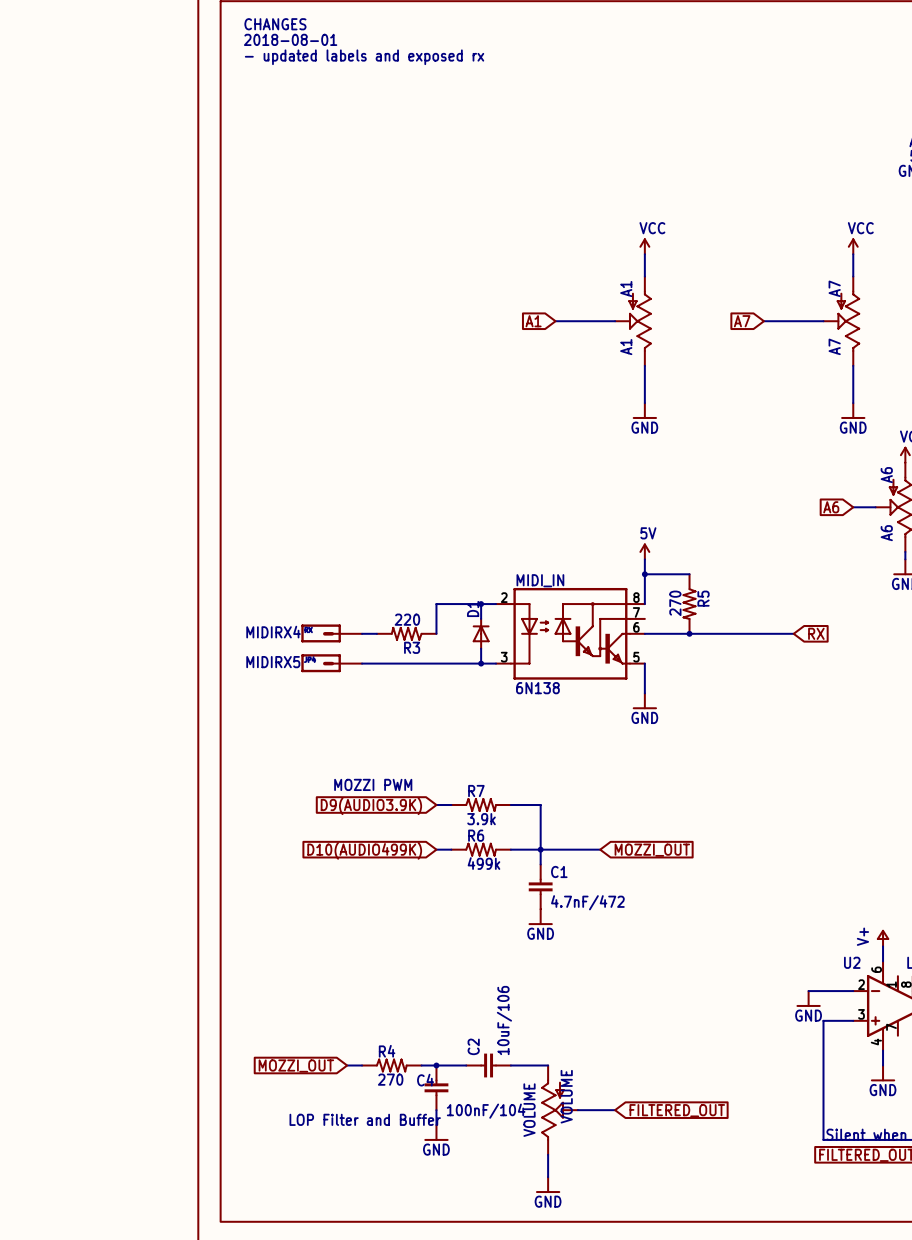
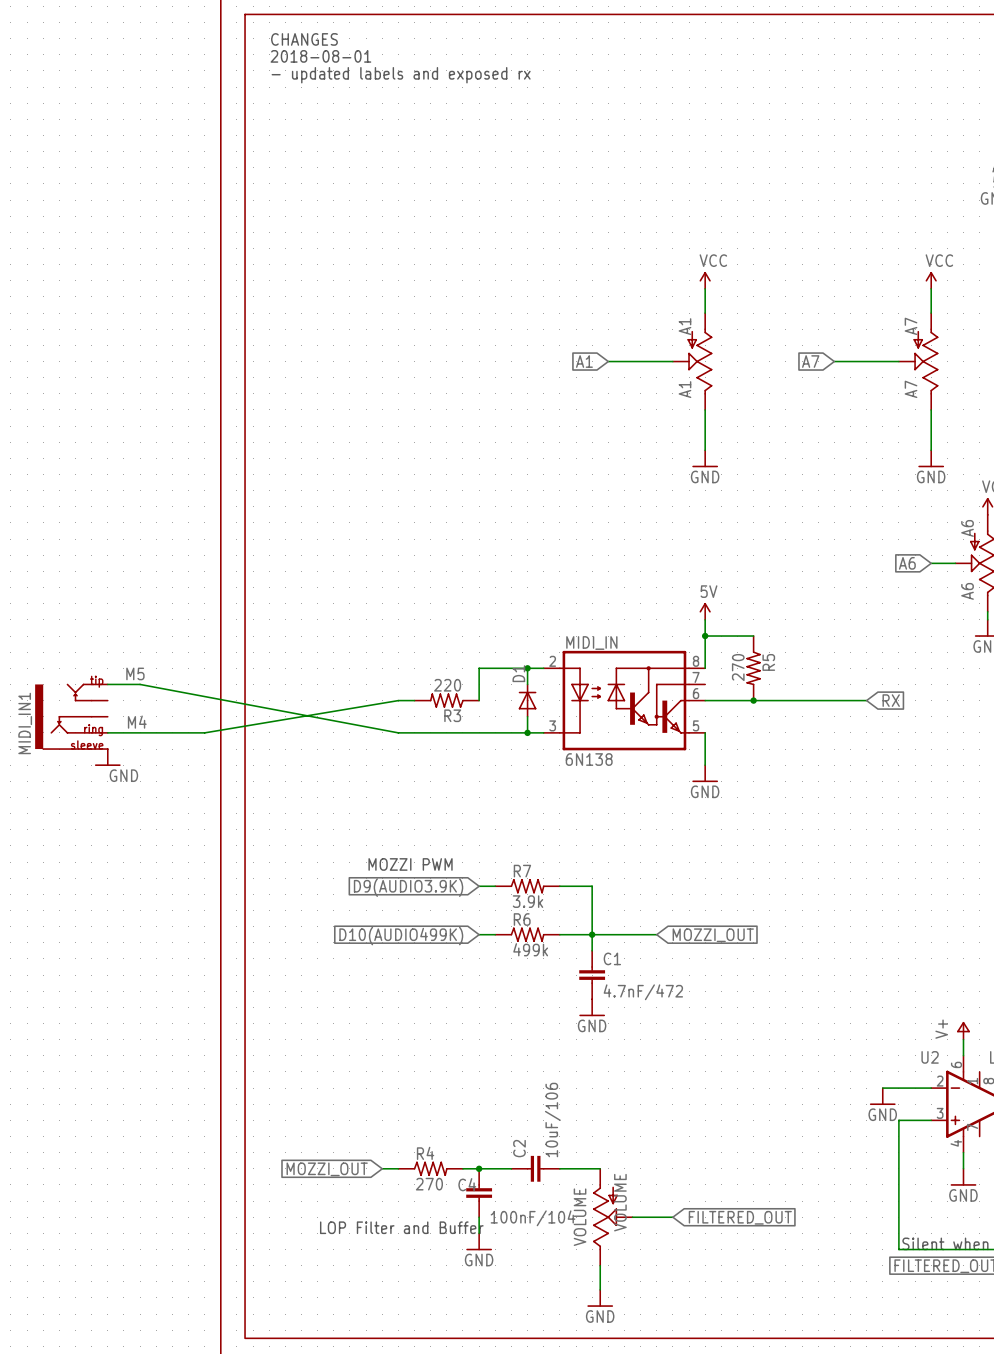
label: none -> M5 (135, 673)
wire: none -> (107, 684) (140, 684) (398, 732)
part: MIDIRX4 (331, 633) -> none
wire: none -> (398, 700) (204, 732) (107, 732)
MIDI_IN1: none -> (71, 716)
label: none -> M4 (137, 722)
part: MIDIRX5 (331, 663) -> none
power symbol: none -> GND (107, 757)

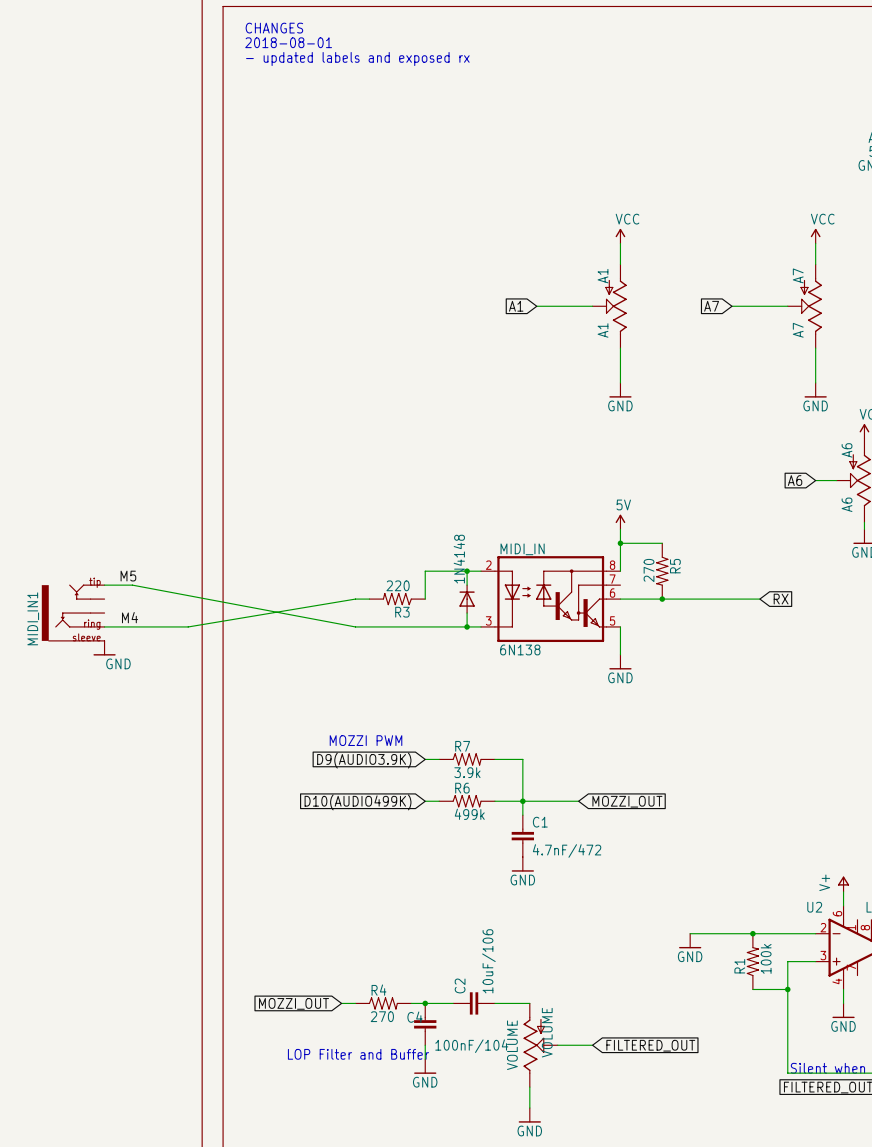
D1 name: D1 (518, 673) -> 1N4148 (459, 559)
wire: none -> (690, 933) (773, 933)
junction: none -> (752, 933)
power symbol position: GND (882, 1096) -> GND (690, 941)
R1: none -> 100k (752, 961)
wire: none -> (752, 989) (787, 989)
junction: none -> (787, 989)

